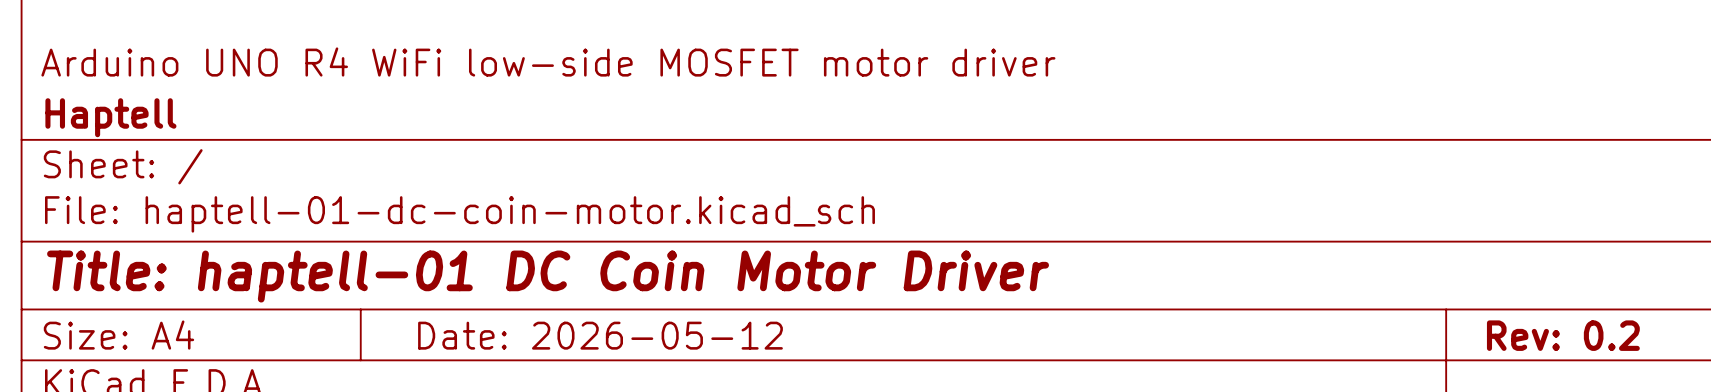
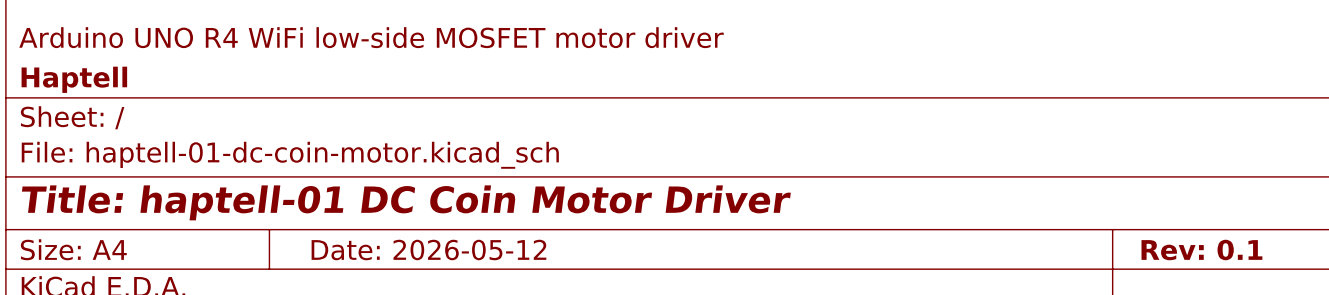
title block: Rev: 0.2 (1563, 335) -> Rev: 0.1 (1201, 250)

